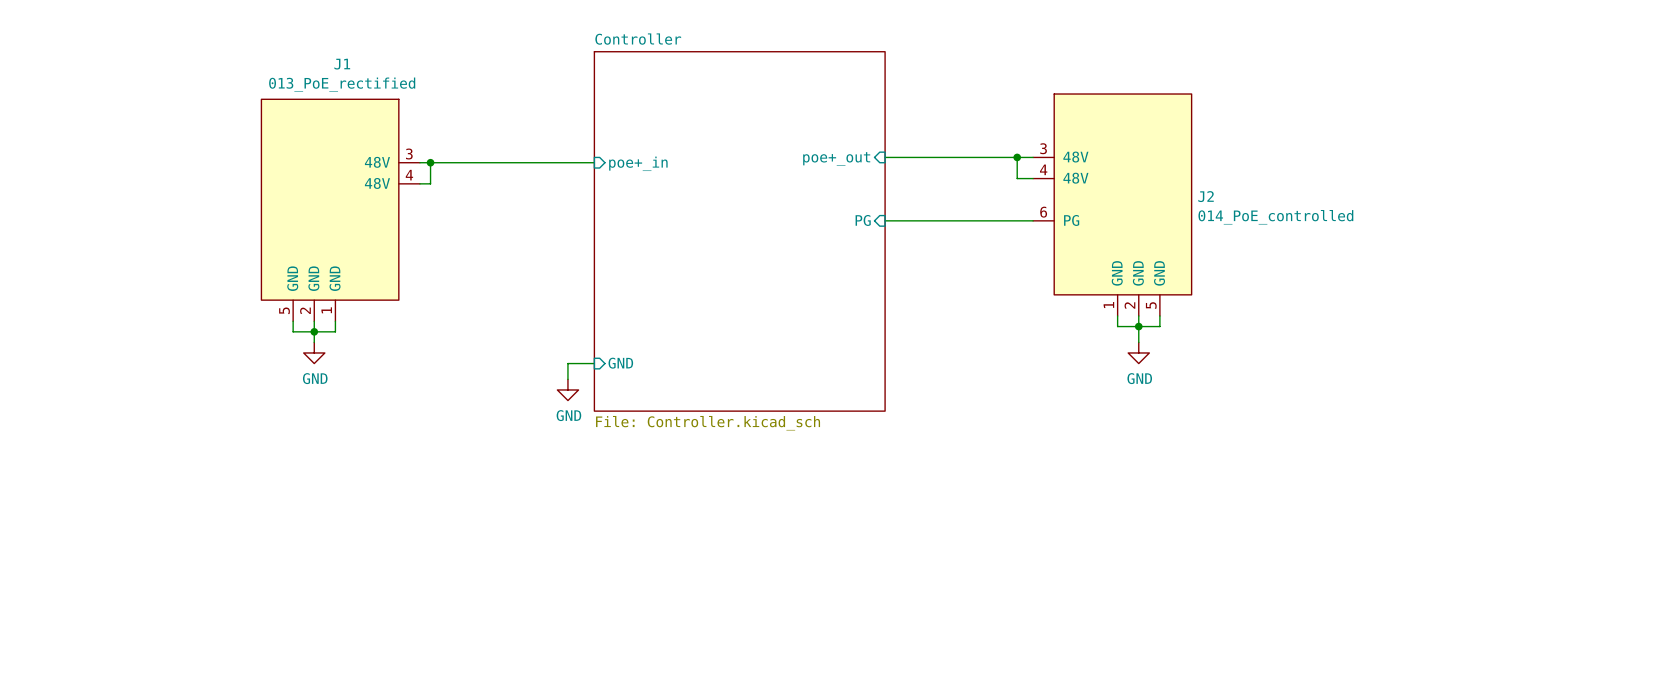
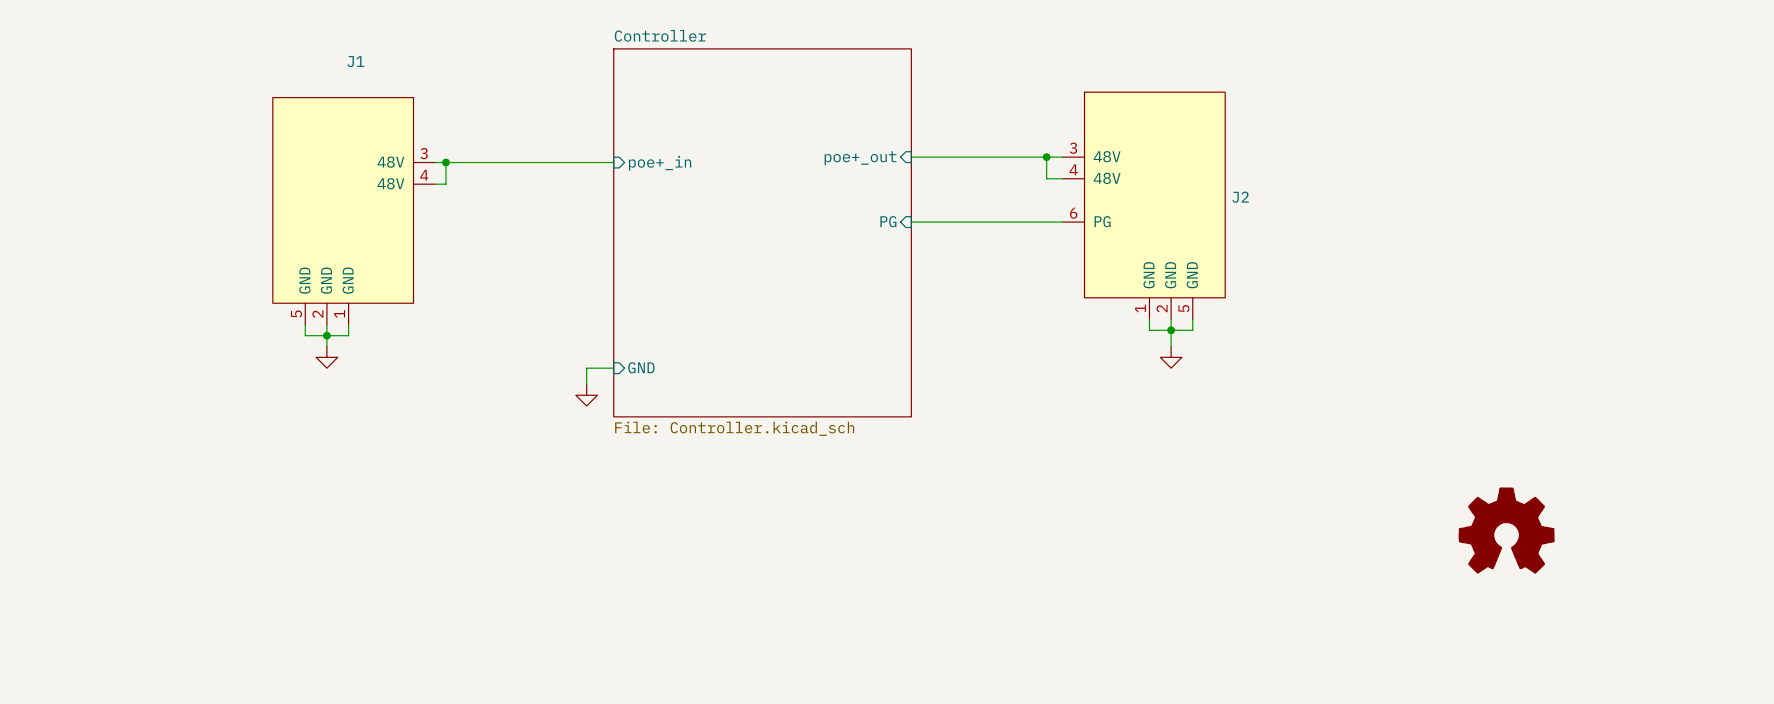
J1 value: 013_PoE_rectified (342, 84) -> none
J2 value: 014_PoE_controlled (1275, 217) -> none
power symbol text: GND (315, 378) -> none
power symbol text: GND (1139, 378) -> none
power symbol text: GND (568, 415) -> none
part: none -> (1506, 530)

